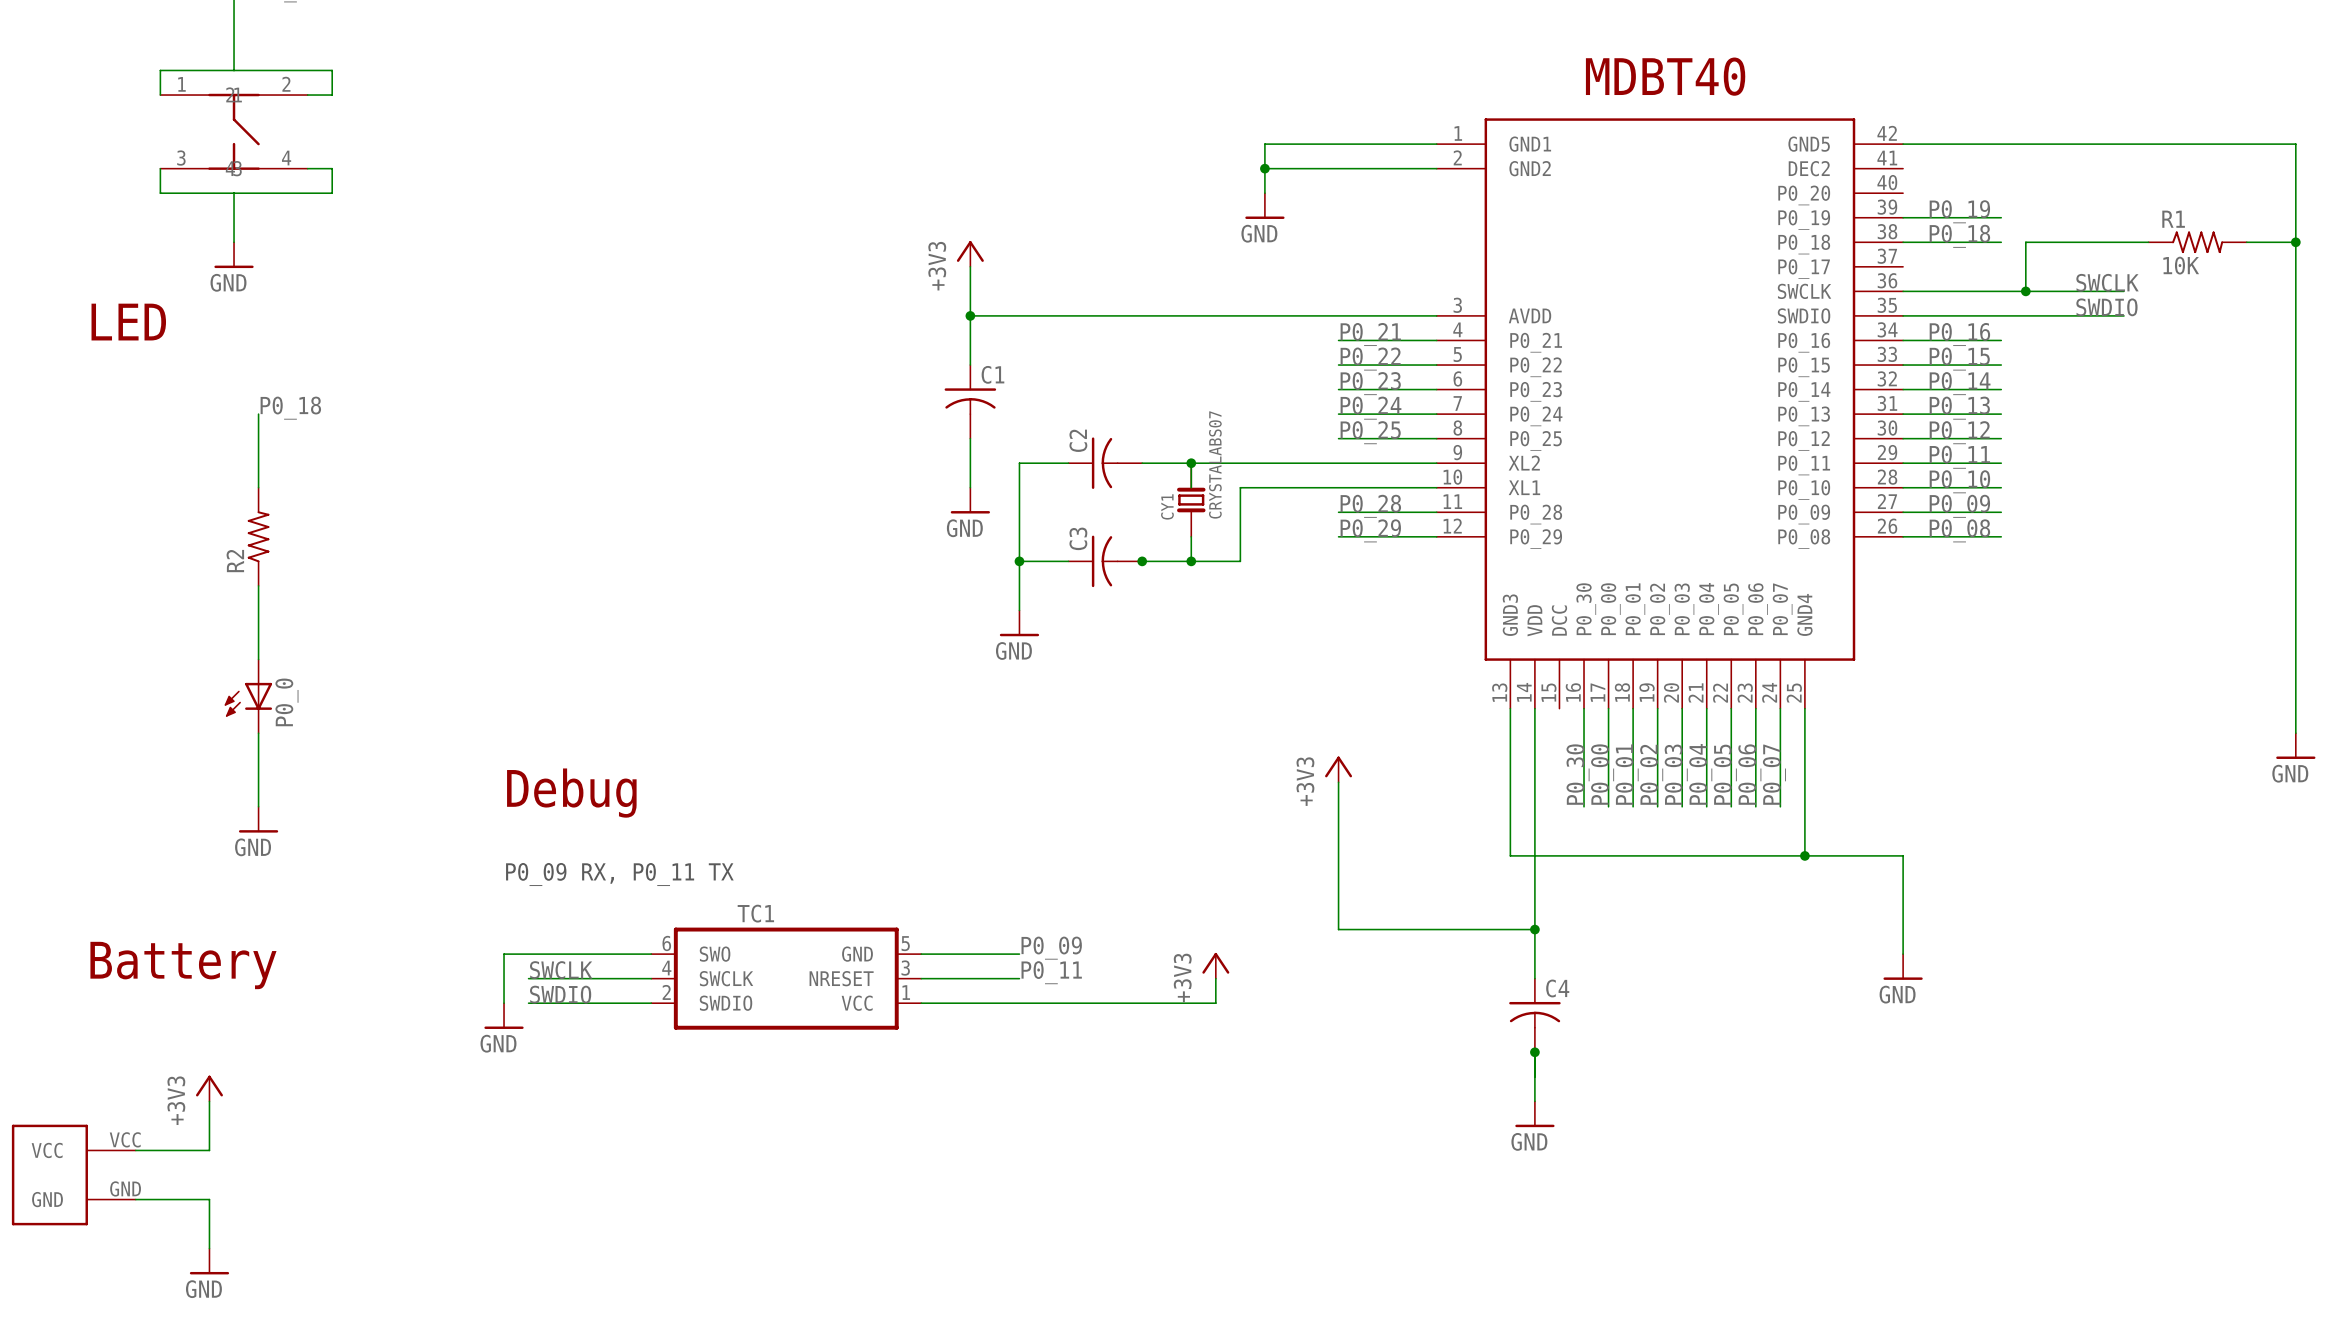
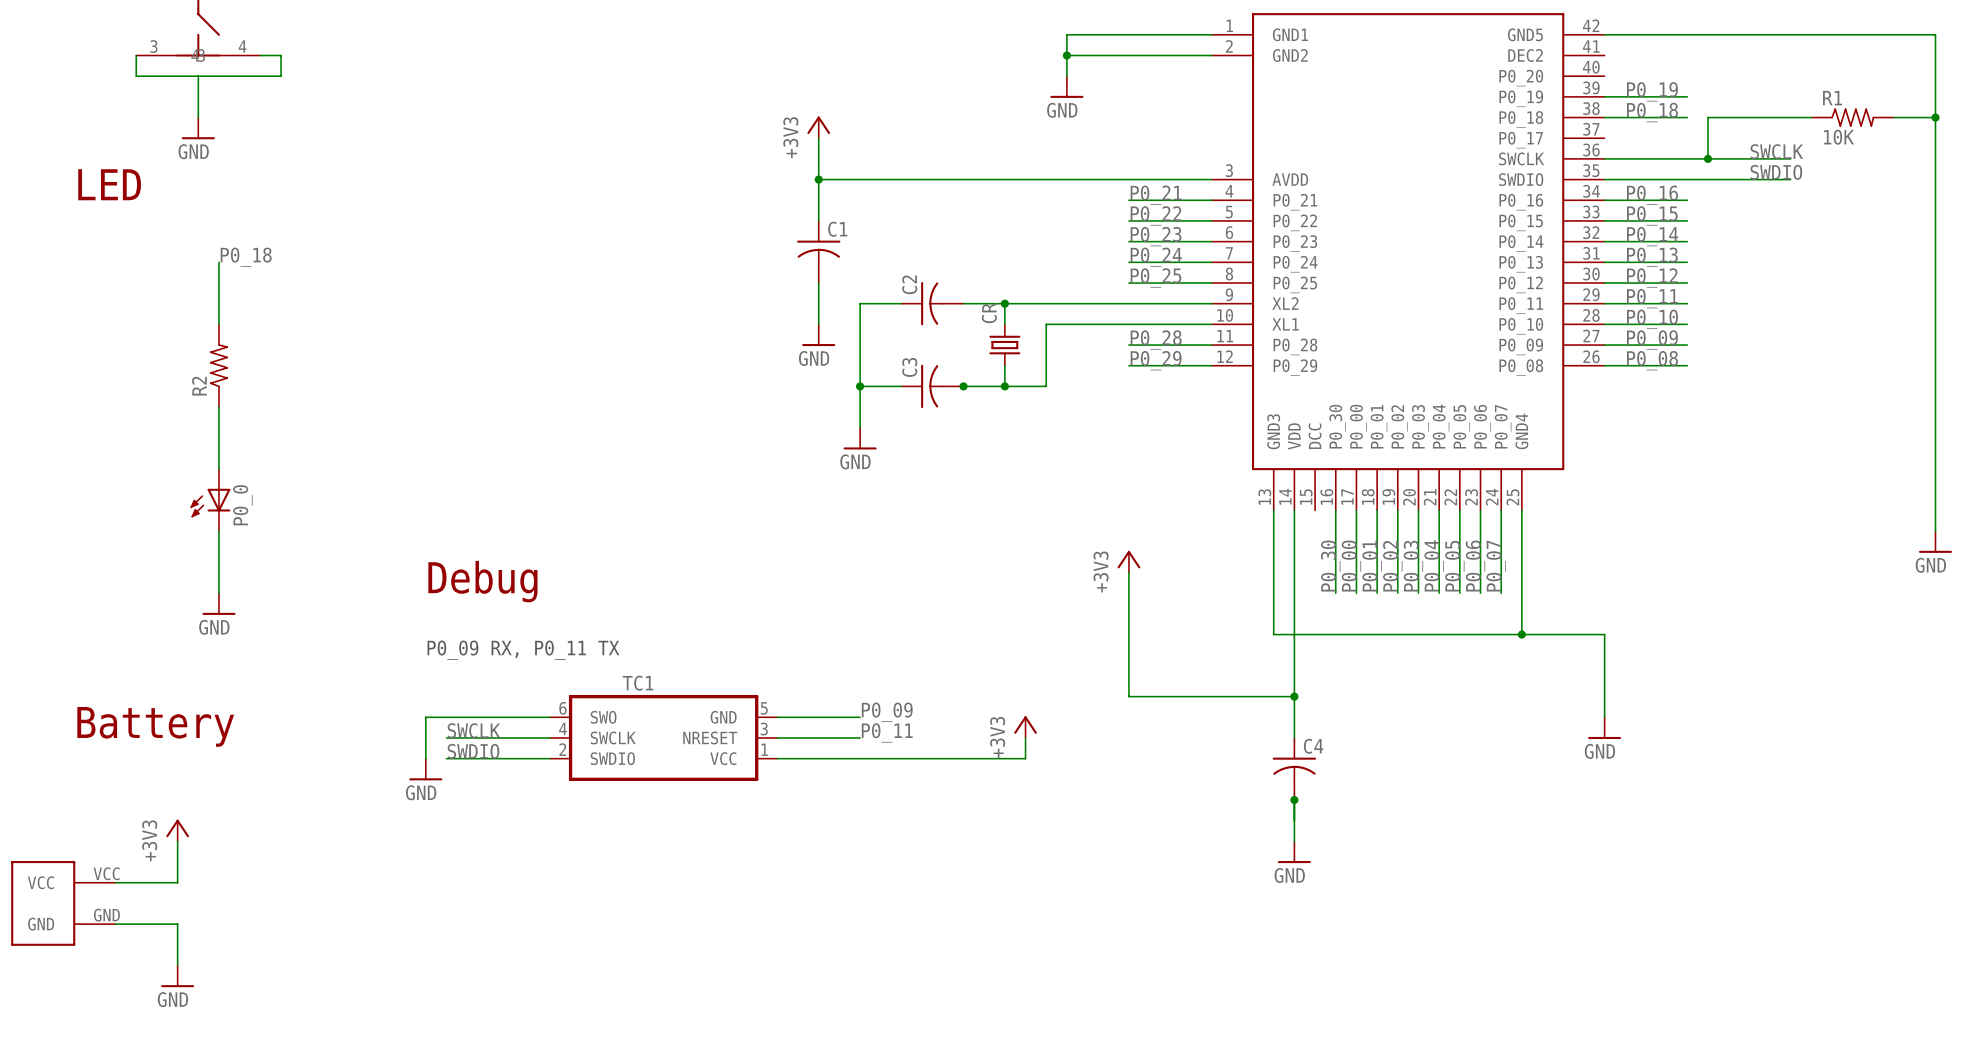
CY1: CRYSTALABS07 (1191, 500) -> none
CR: none -> (1004, 345)

